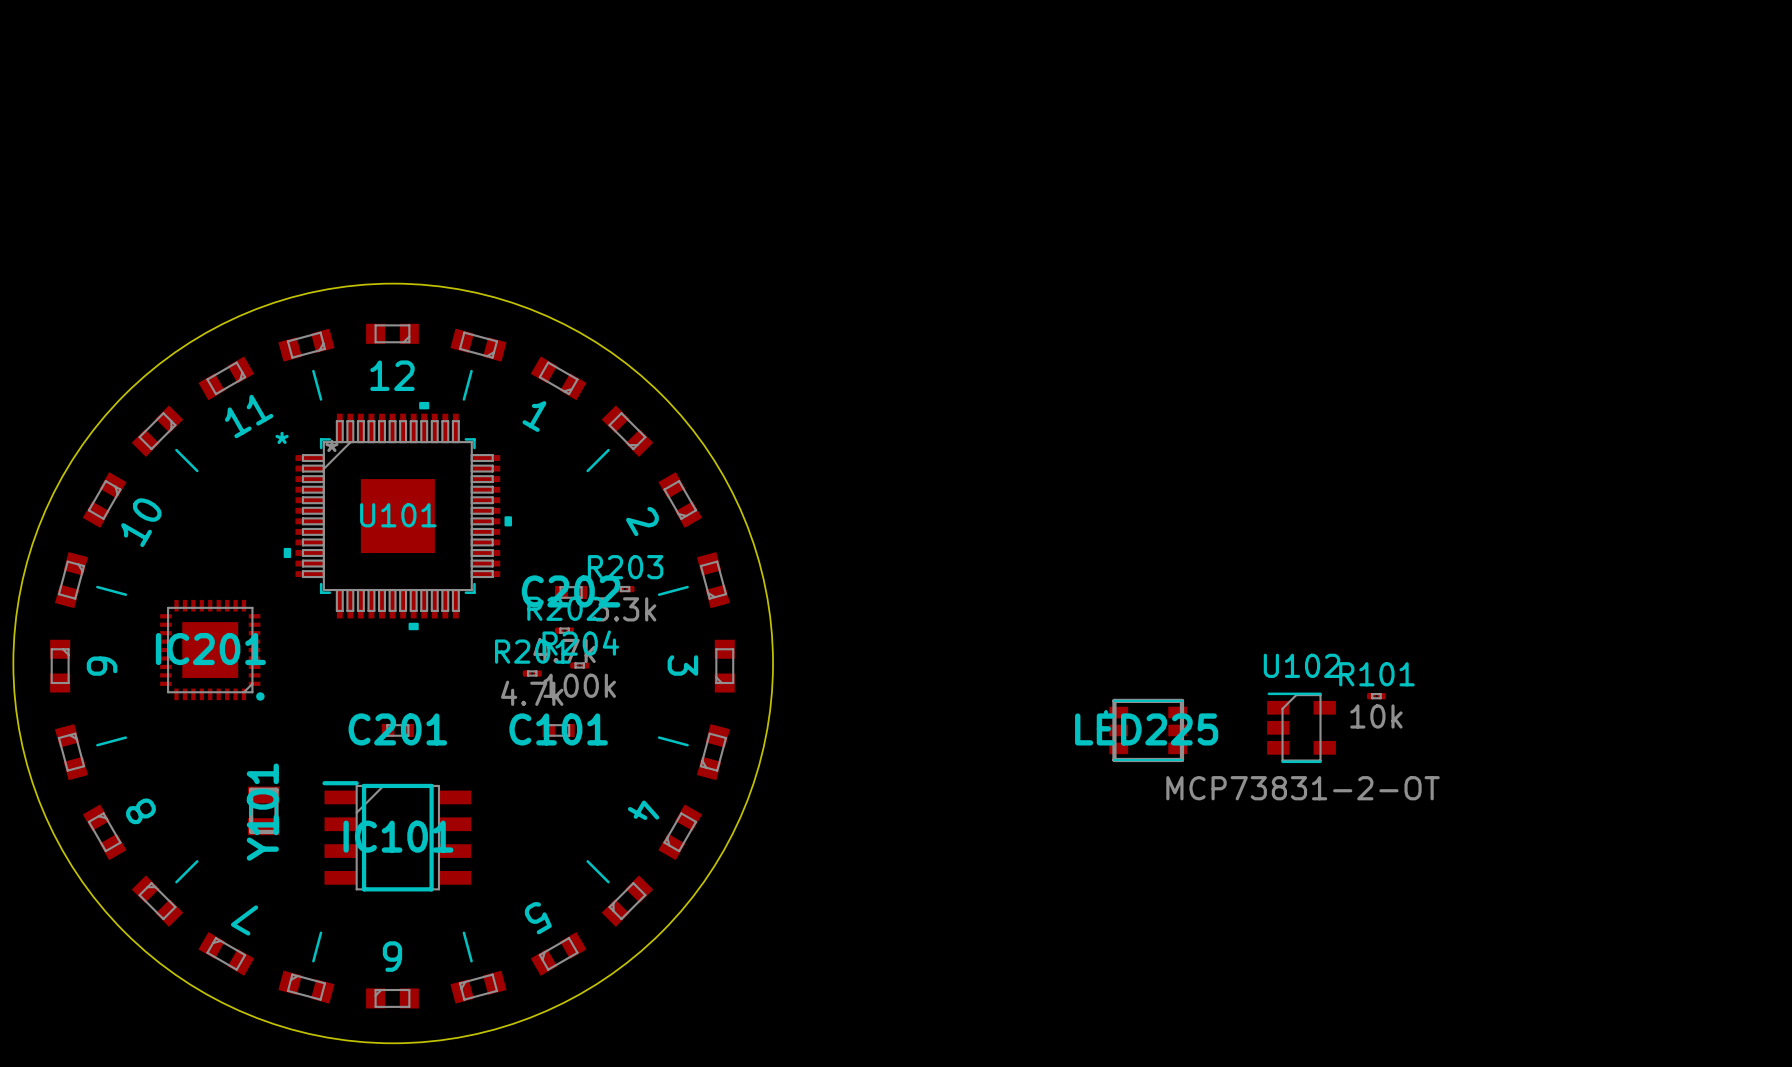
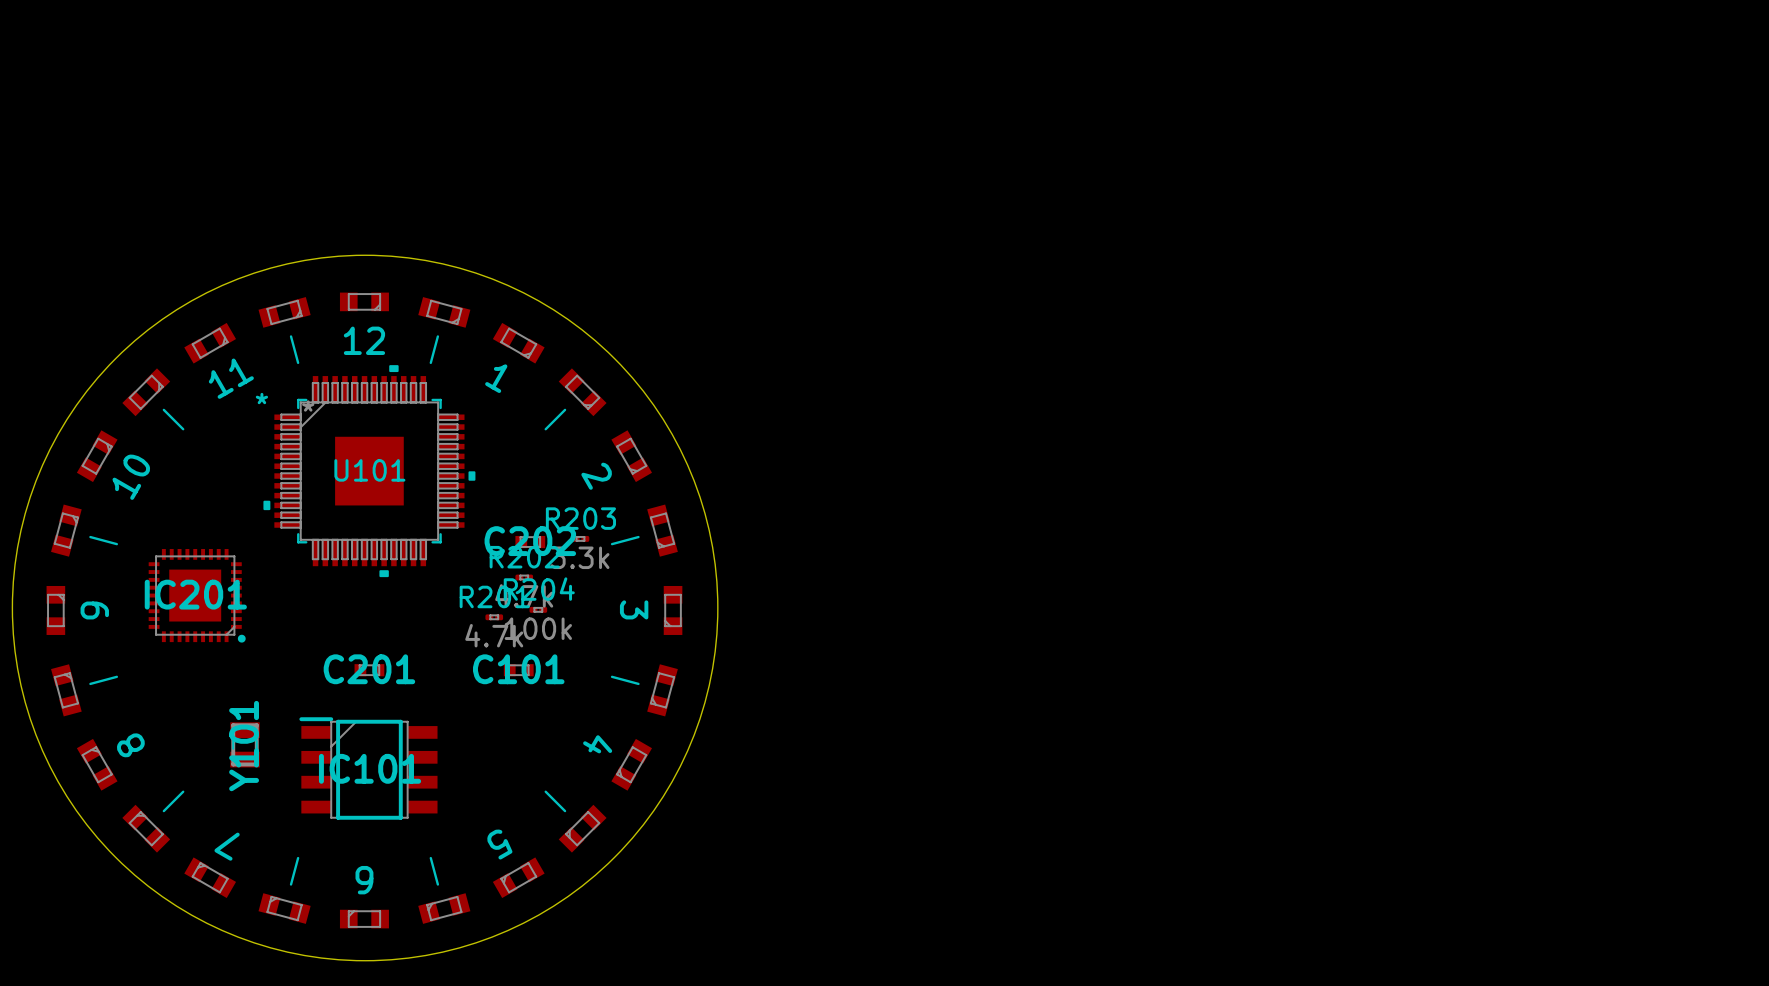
R101: 10k (1376, 696) -> none
U102: MCP73831-2-OT (1301, 727) -> none
LED225: (1145, 730) -> none

